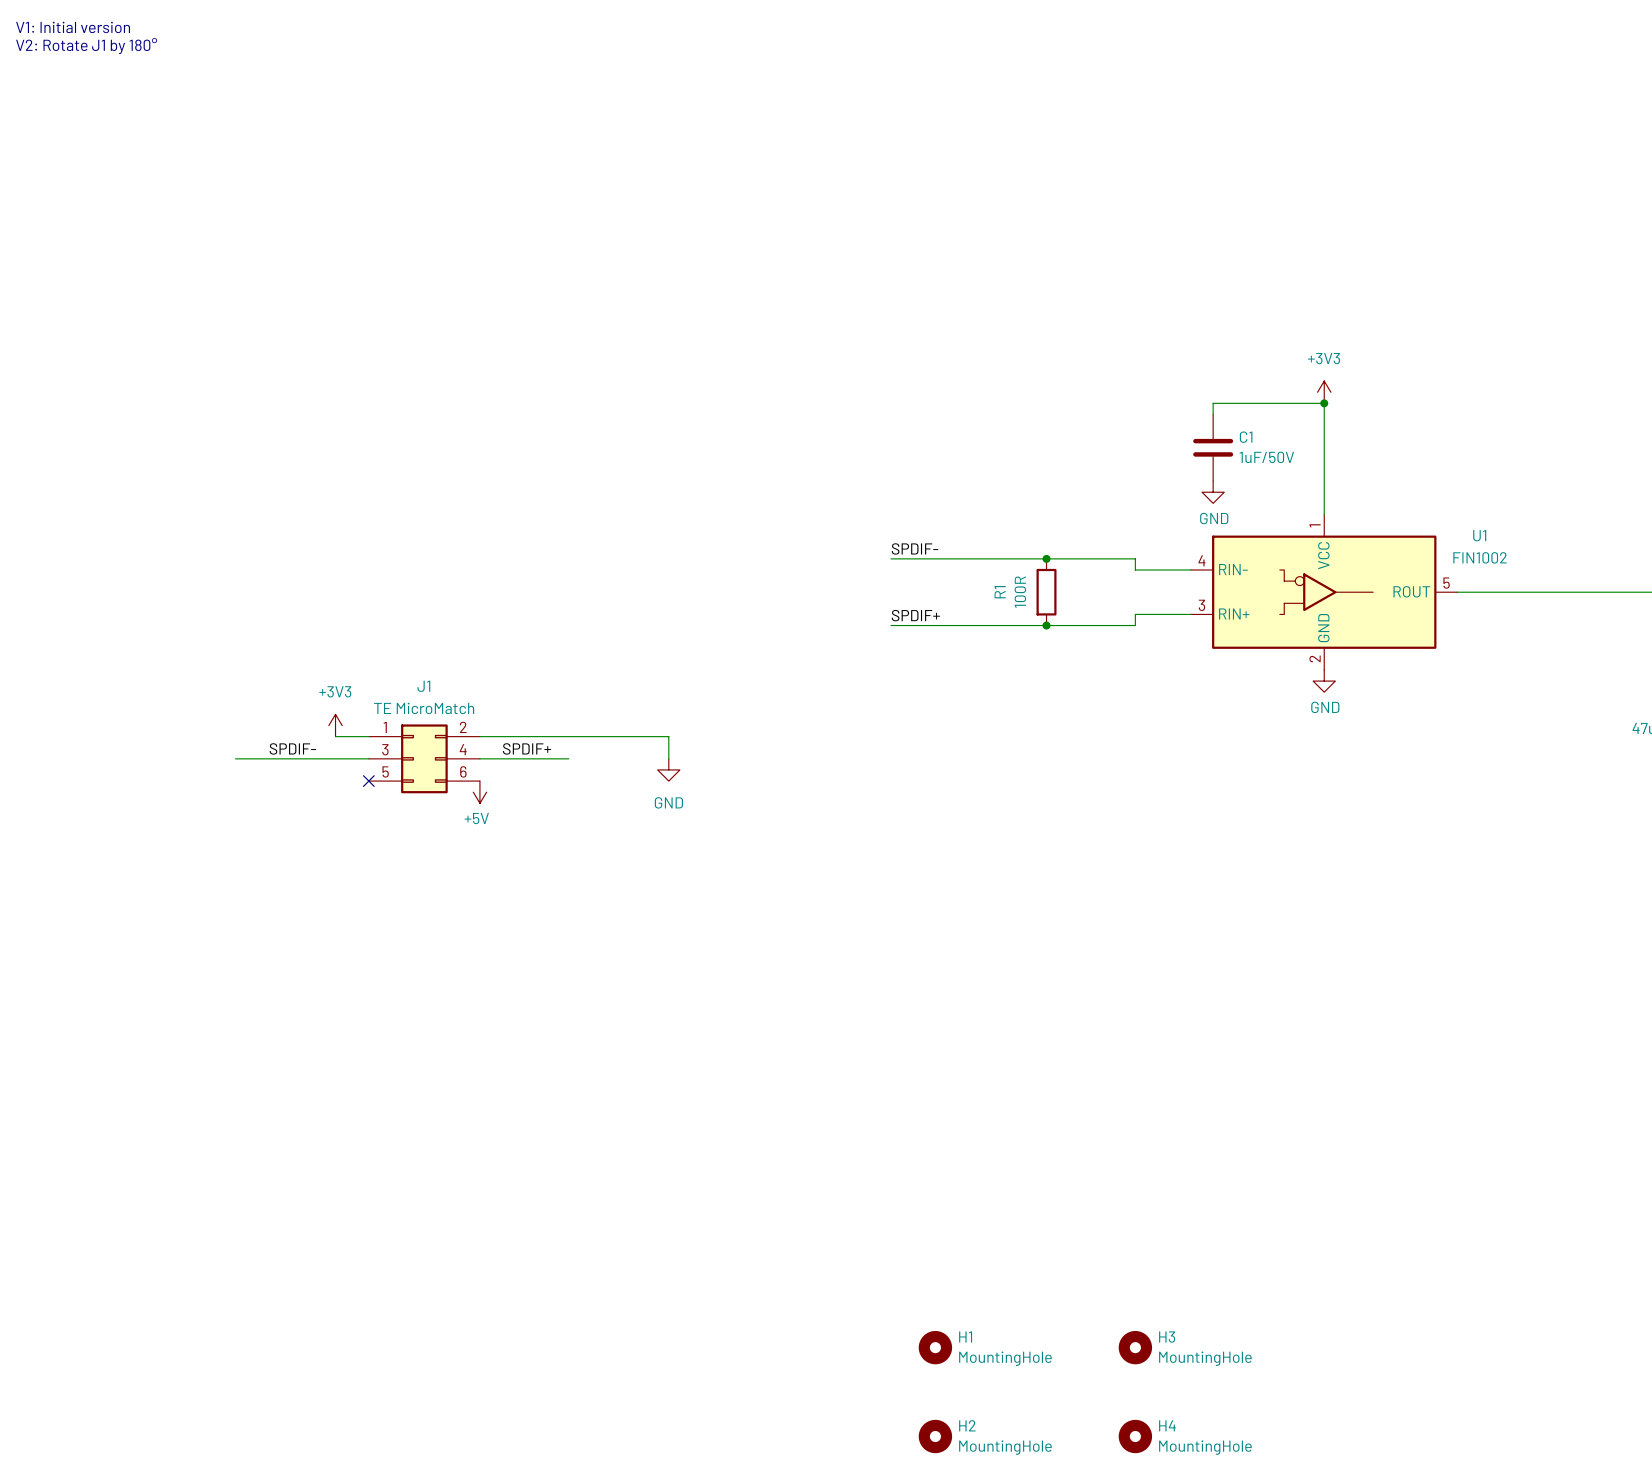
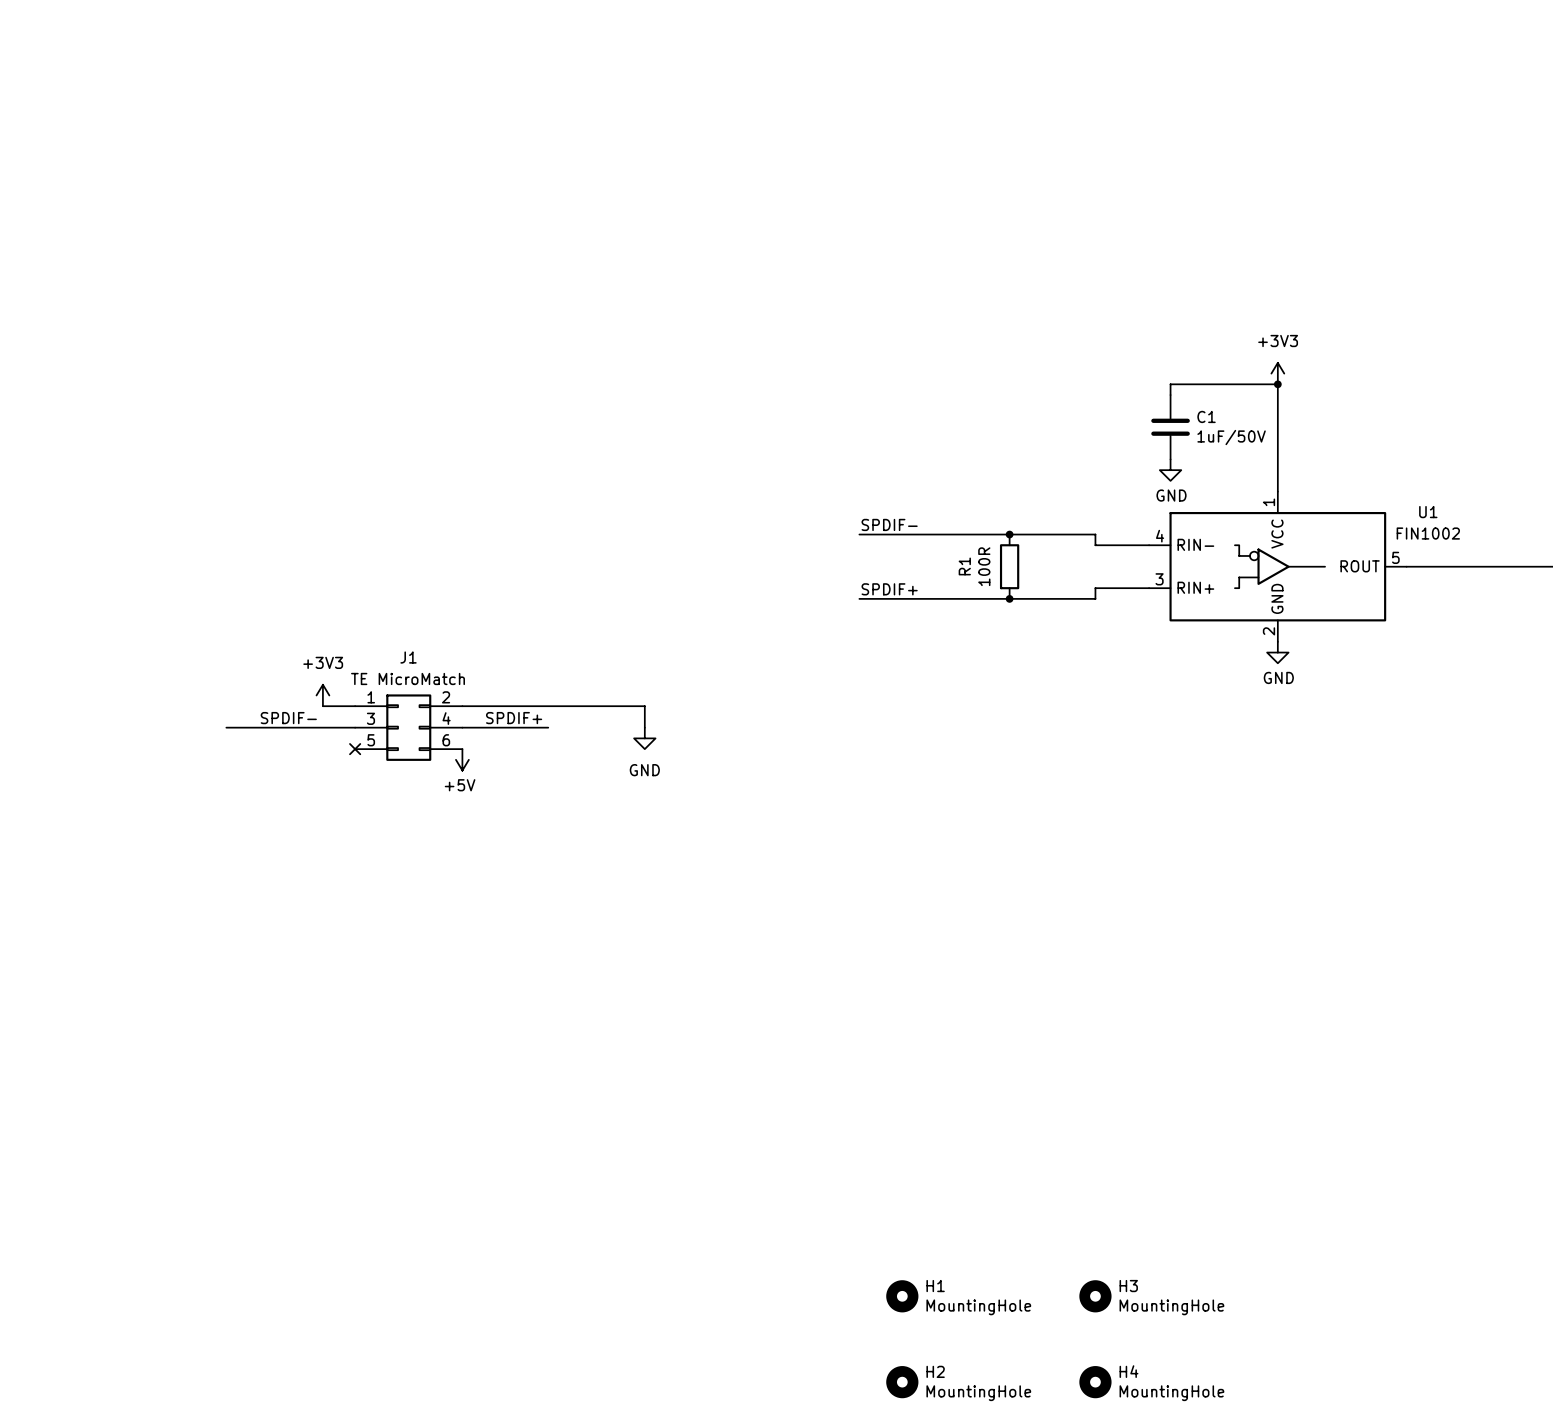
text: V1: Initial version (73, 27) -> none
text: V2: Rotate J1 by 180° (86, 46) -> none

